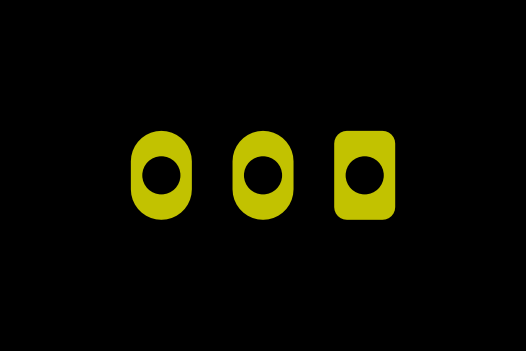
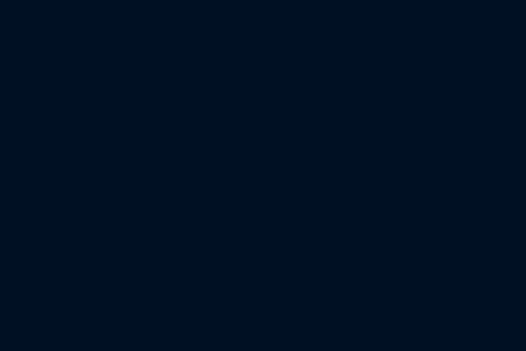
part: (263, 175) -> none

